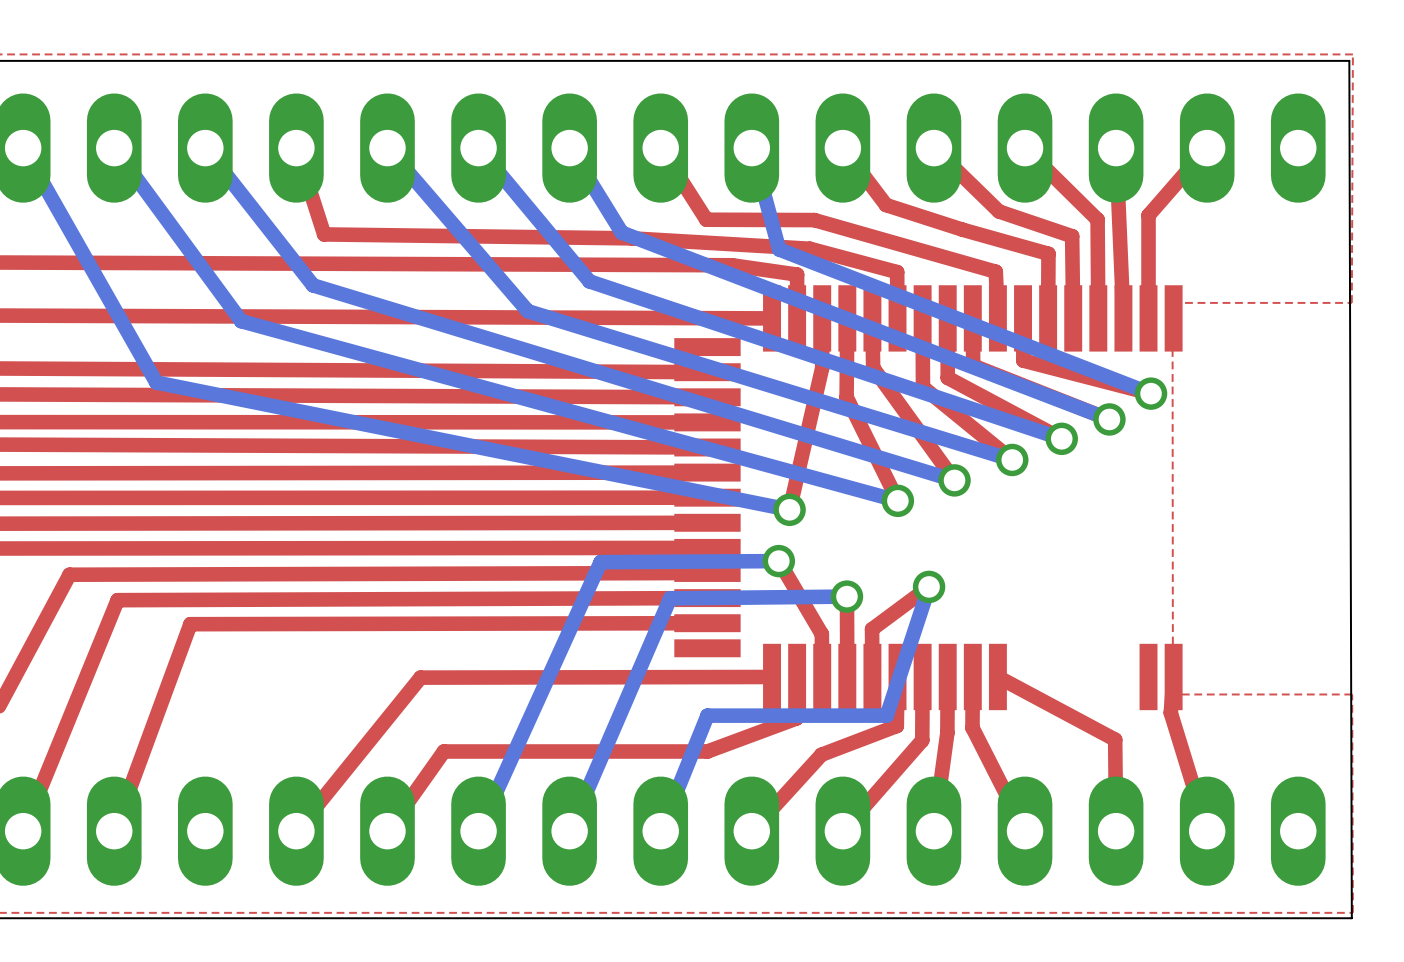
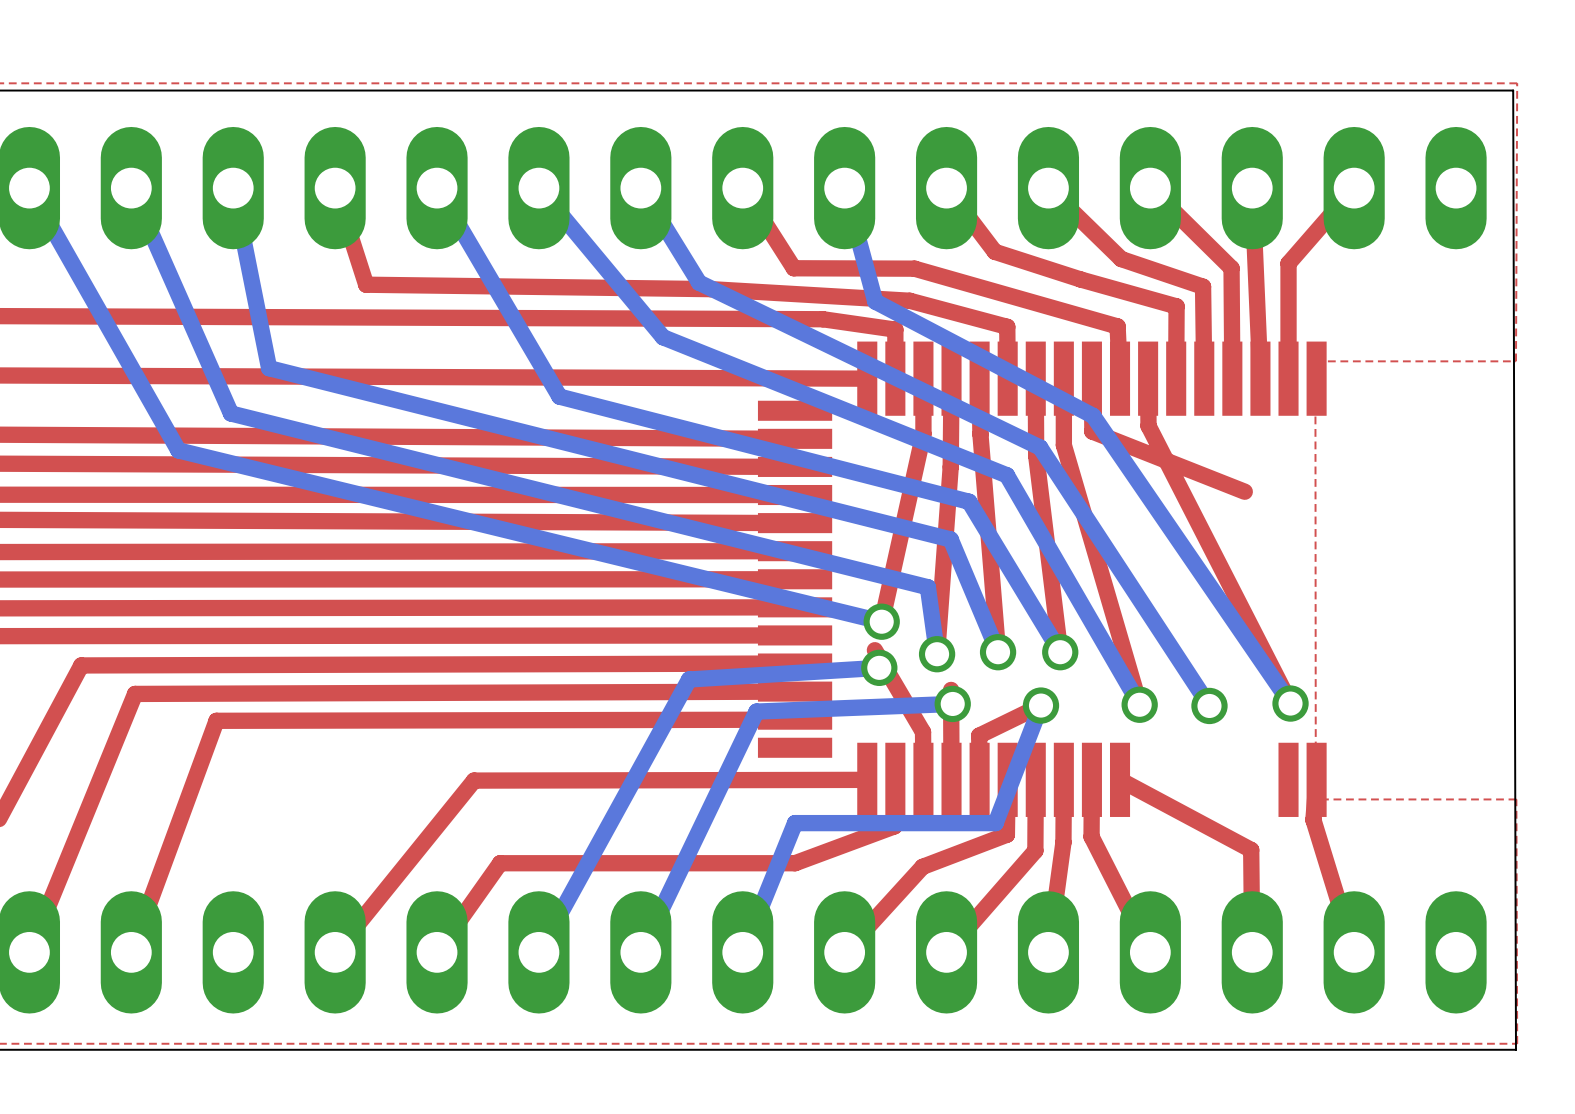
bottom track: (114, 148) (241, 321) (897, 500) -> (131, 188) (230, 413) (927, 587) (937, 654)
bottom track: (205, 148) (313, 285) (954, 480) -> (233, 188) (269, 368) (950, 539) (998, 652)
bottom track: (387, 148) (527, 311) (1012, 459) -> (437, 188) (559, 396) (969, 501) (1060, 652)
bottom track: (621, 232) (1109, 419) -> (699, 282) (1040, 447) (1209, 705)
bottom track: (779, 249) (1151, 393) -> (875, 301) (1093, 415) (1290, 703)
bottom track: (589, 281) (1061, 438) -> (663, 337) (1006, 475) (1139, 704)
top track: (1023, 360) (1151, 393) -> (1148, 425) (1290, 703)
top track: (822, 367) (789, 509) -> (923, 433) (881, 621)
top track: (873, 367) (954, 480) -> (980, 433) (998, 652)
top track: (947, 377) (1061, 438) -> (1063, 445) (1139, 704)
bottom track: (156, 382) (789, 509) -> (178, 450) (881, 621)
top track: (922, 387) (1012, 459) -> (1036, 455) (1060, 652)
via: (1151, 393) -> none
top track: (846, 397) (897, 500) -> (950, 466) (937, 654)
via: (1109, 419) -> none
via: (1061, 438) -> none
via: (1012, 459) -> none
via: (954, 480) -> none
via: (897, 500) -> none
via: (789, 509) -> none
via: none -> (881, 621)
bottom track: (778, 561) (600, 562) (478, 831) -> (879, 667) (689, 679) (538, 952)
via: (778, 561) -> none
via: none -> (998, 652)
via: none -> (1060, 652)
via: none -> (937, 654)
via: none -> (879, 667)
top track: (929, 586) (872, 629) (872, 676) -> (1040, 705) (979, 735) (979, 779)
bottom track: (929, 586) (886, 715) -> (1040, 705) (995, 823)
via: (929, 586) -> none
bottom track: (846, 596) (670, 598) (569, 831) -> (952, 703) (756, 711) (640, 952)
via position: (846, 596) -> (952, 703)
via: none -> (1290, 703)
via: none -> (1139, 704)
via: none -> (1040, 705)
via: none -> (1209, 705)

